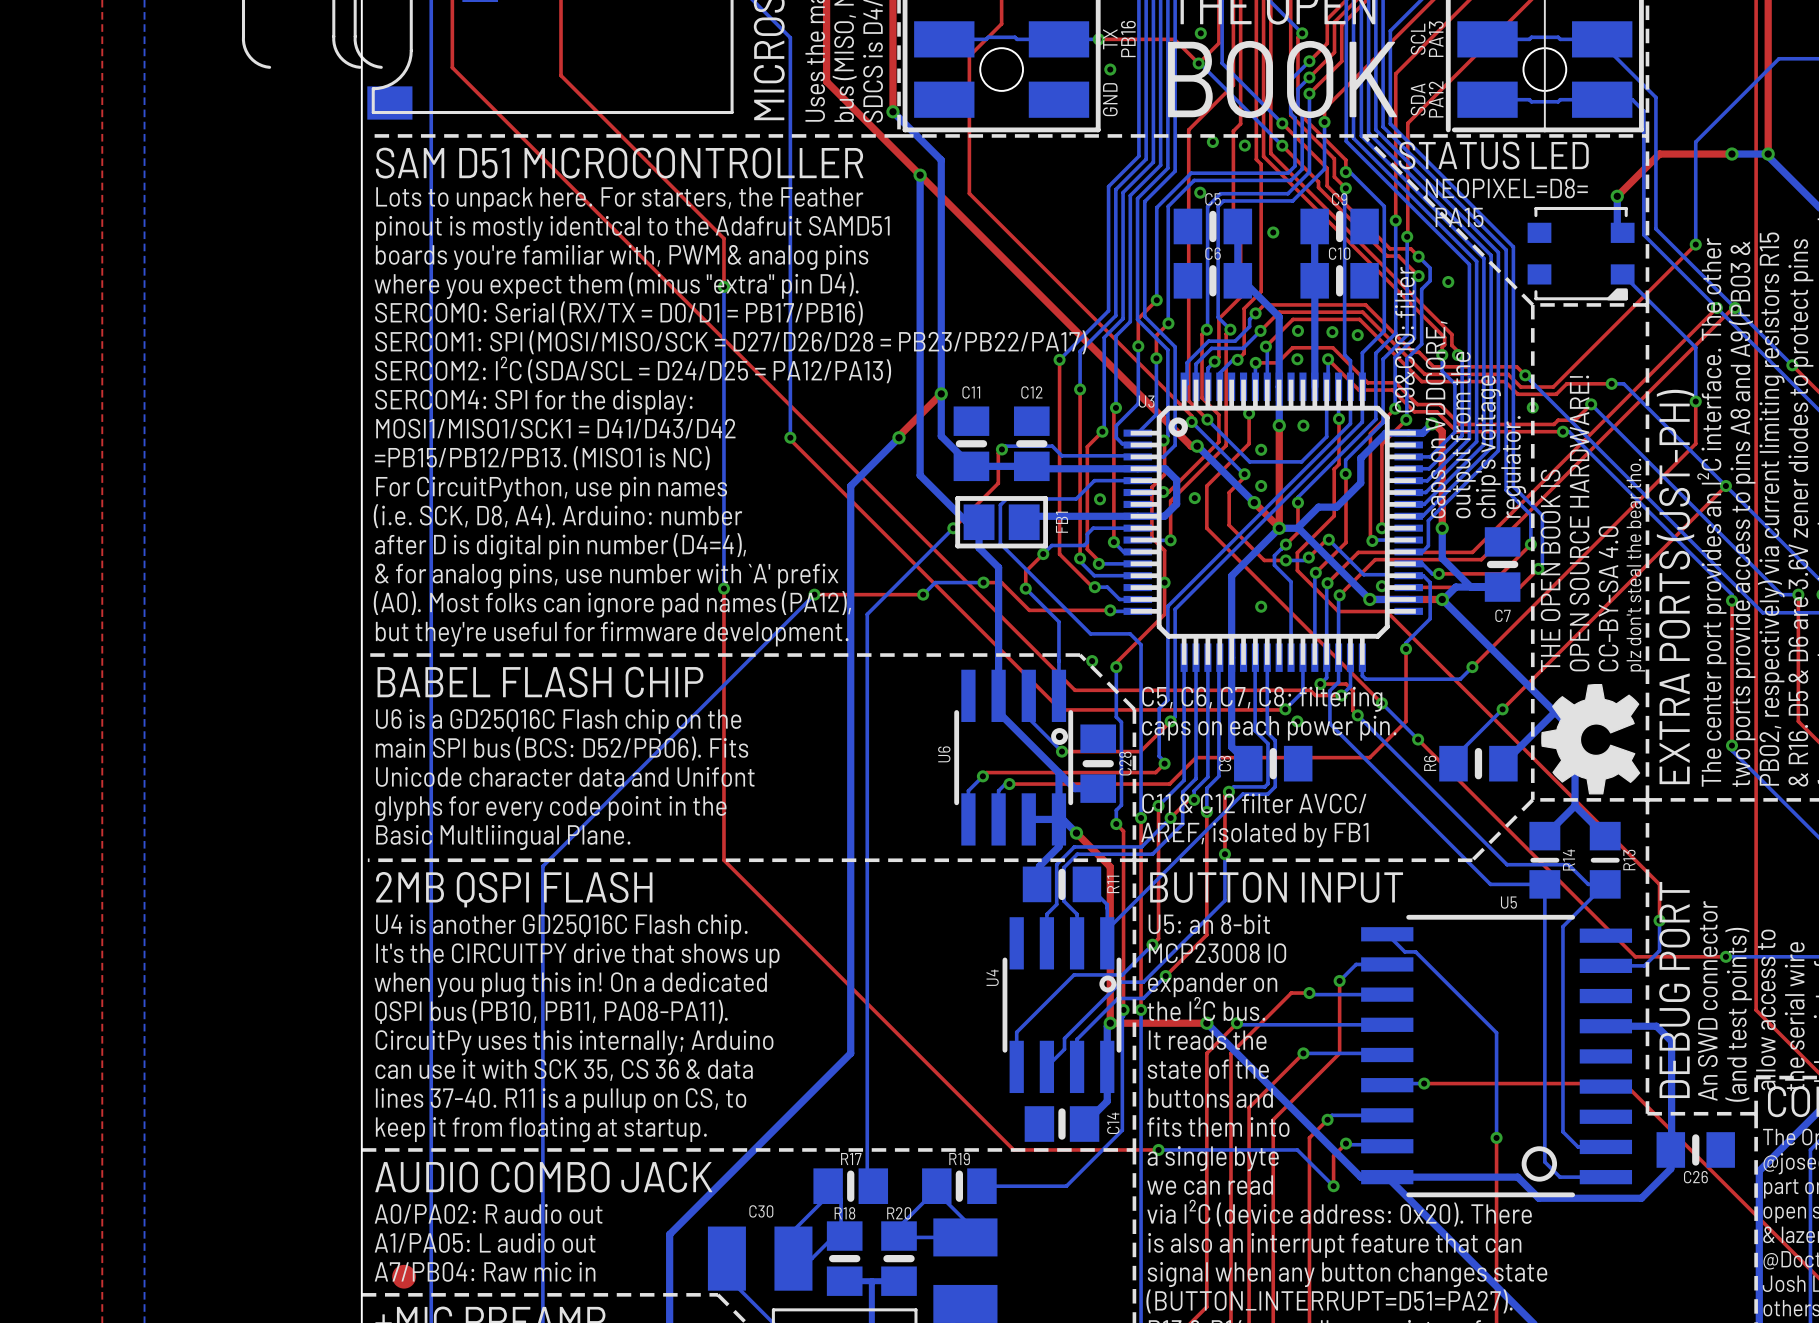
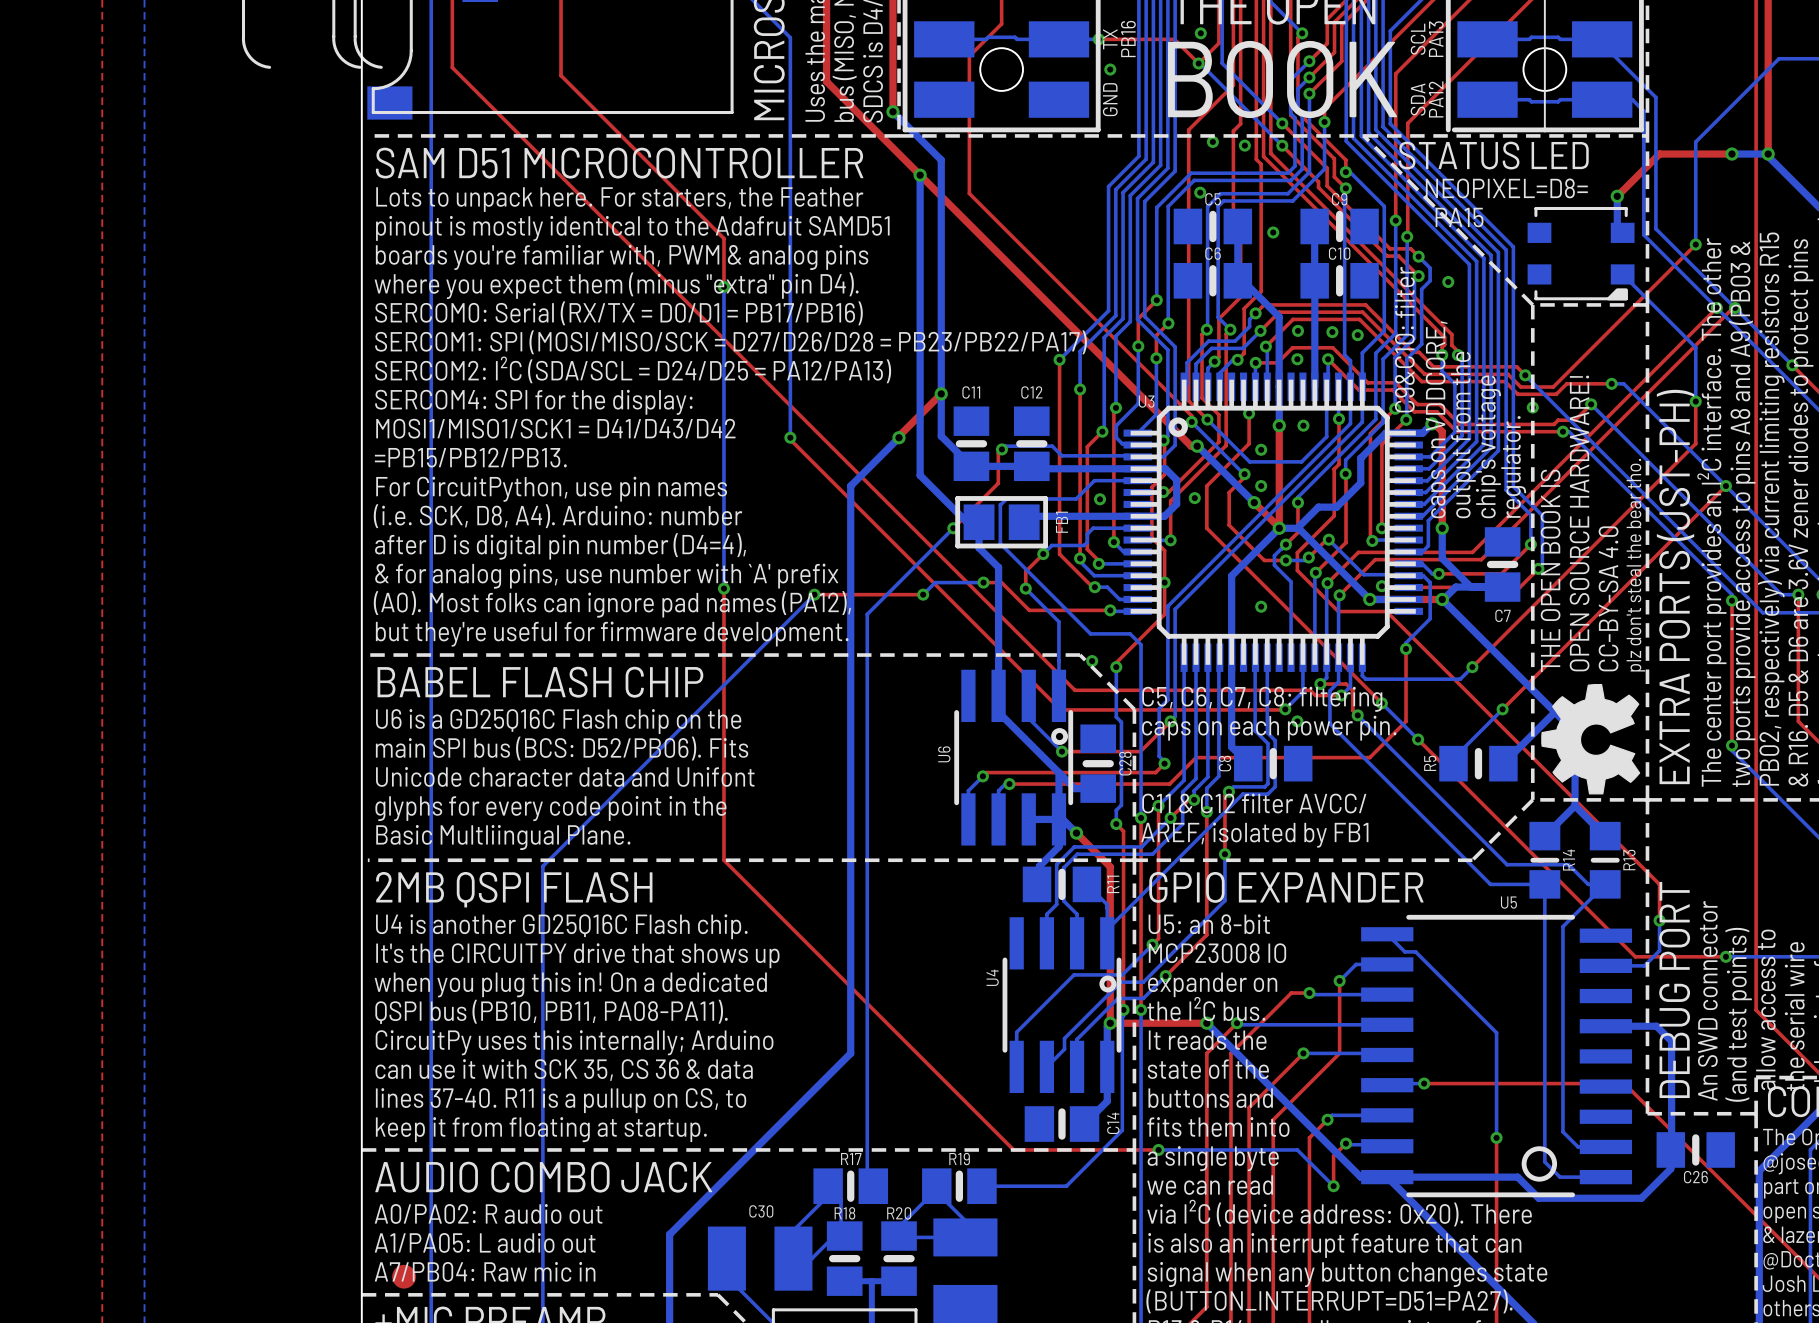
text: =PB15/PB12/PB13. (MISO1 is NC) (542, 458) -> =PB15/PB12/PB13. (470, 457)
R6 name: R6 (1430, 763) -> R5 (1430, 763)
text: BUTTON INPUT (1276, 887) -> GPIO EXPANDER (1286, 887)

